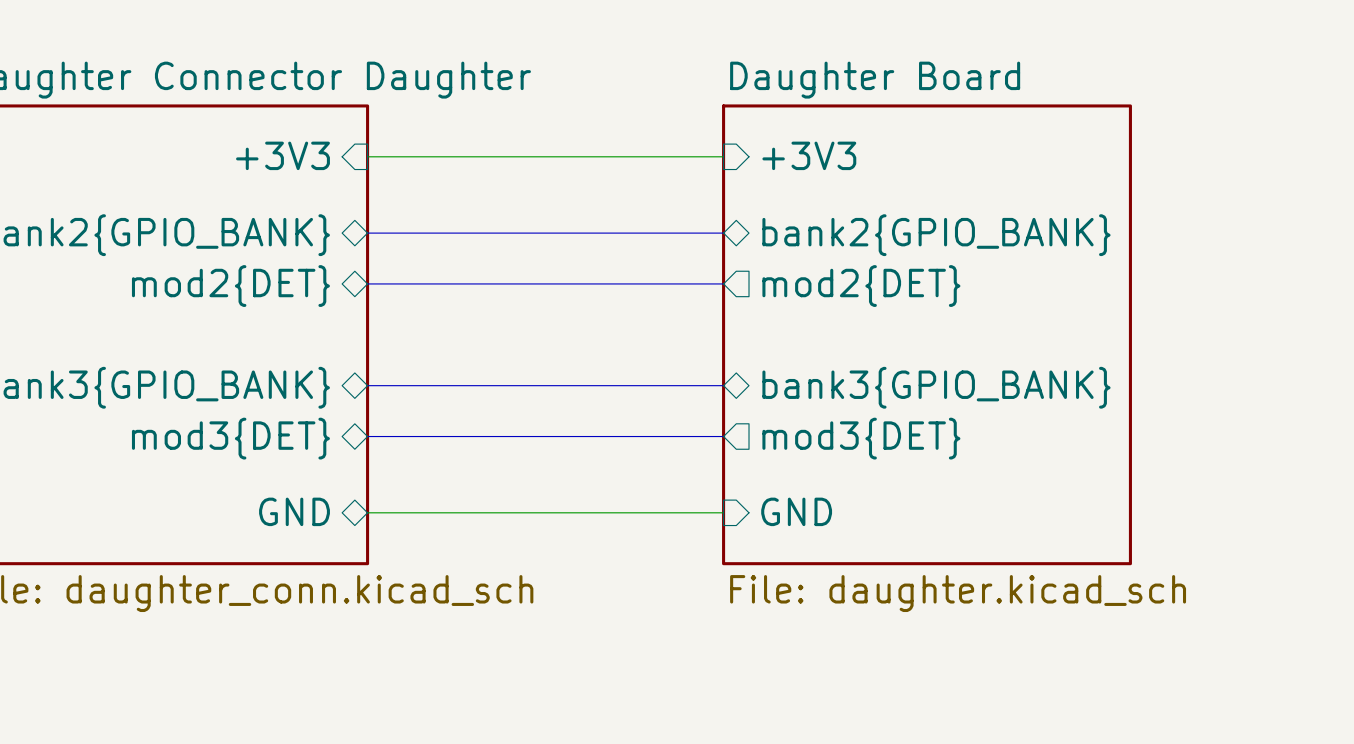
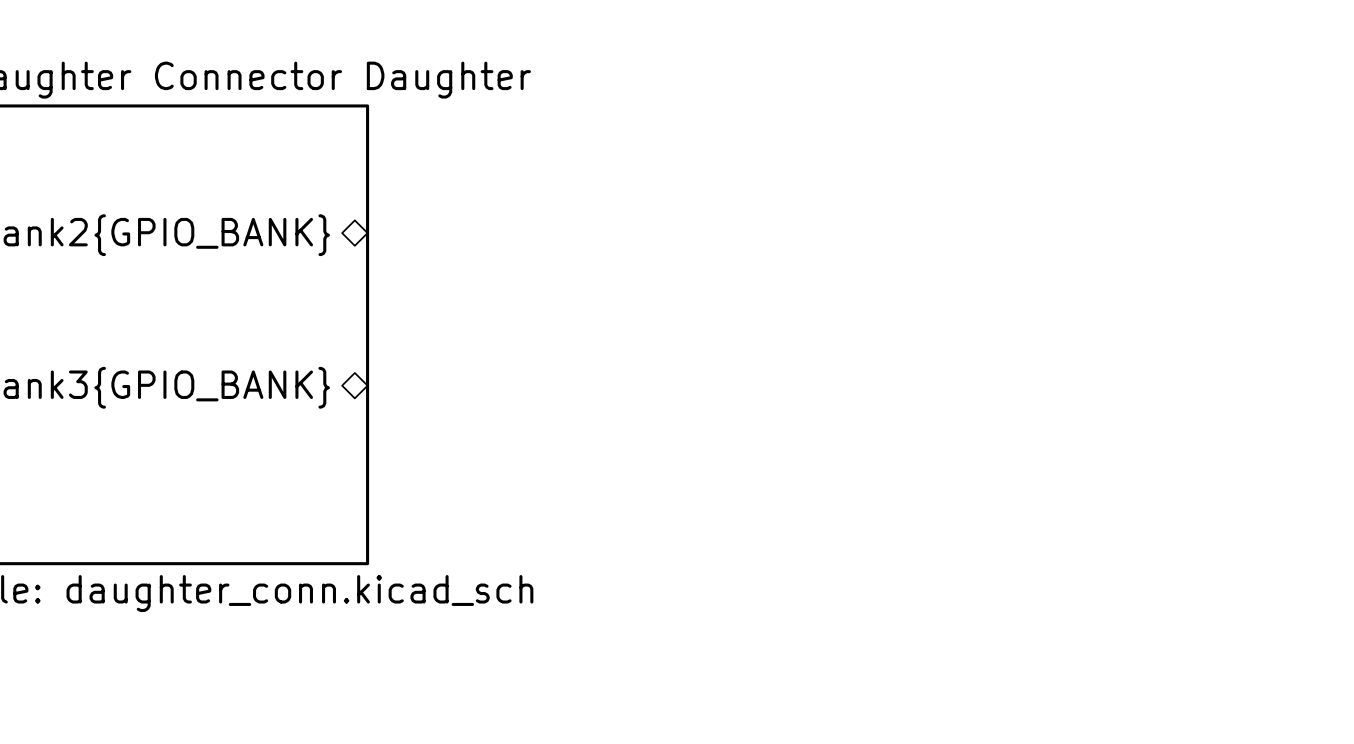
sheet pin: +3V3 (283, 155) -> none
sheet pin: +3V3 (809, 155) -> none
wire: (367, 156) (723, 156) -> none
bus: (367, 233) (723, 233) -> none
sheet pin: bank2{GPIO_BANK} (936, 235) -> none
bus: (367, 283) (723, 283) -> none
sheet pin: mod2{DET} (230, 286) -> none
sheet pin: mod2{DET} (861, 286) -> none
sheet Daughter Board: File: daughter.kicad_sch (927, 334) -> none
bus: (367, 385) (723, 385) -> none
sheet pin: bank3{GPIO_BANK} (936, 387) -> none
bus: (367, 436) (723, 436) -> none
sheet pin: mod3{DET} (230, 438) -> none
sheet pin: mod3{DET} (861, 438) -> none
sheet pin: GND (294, 511) -> none
sheet pin: GND (796, 511) -> none
wire: (367, 512) (723, 512) -> none

